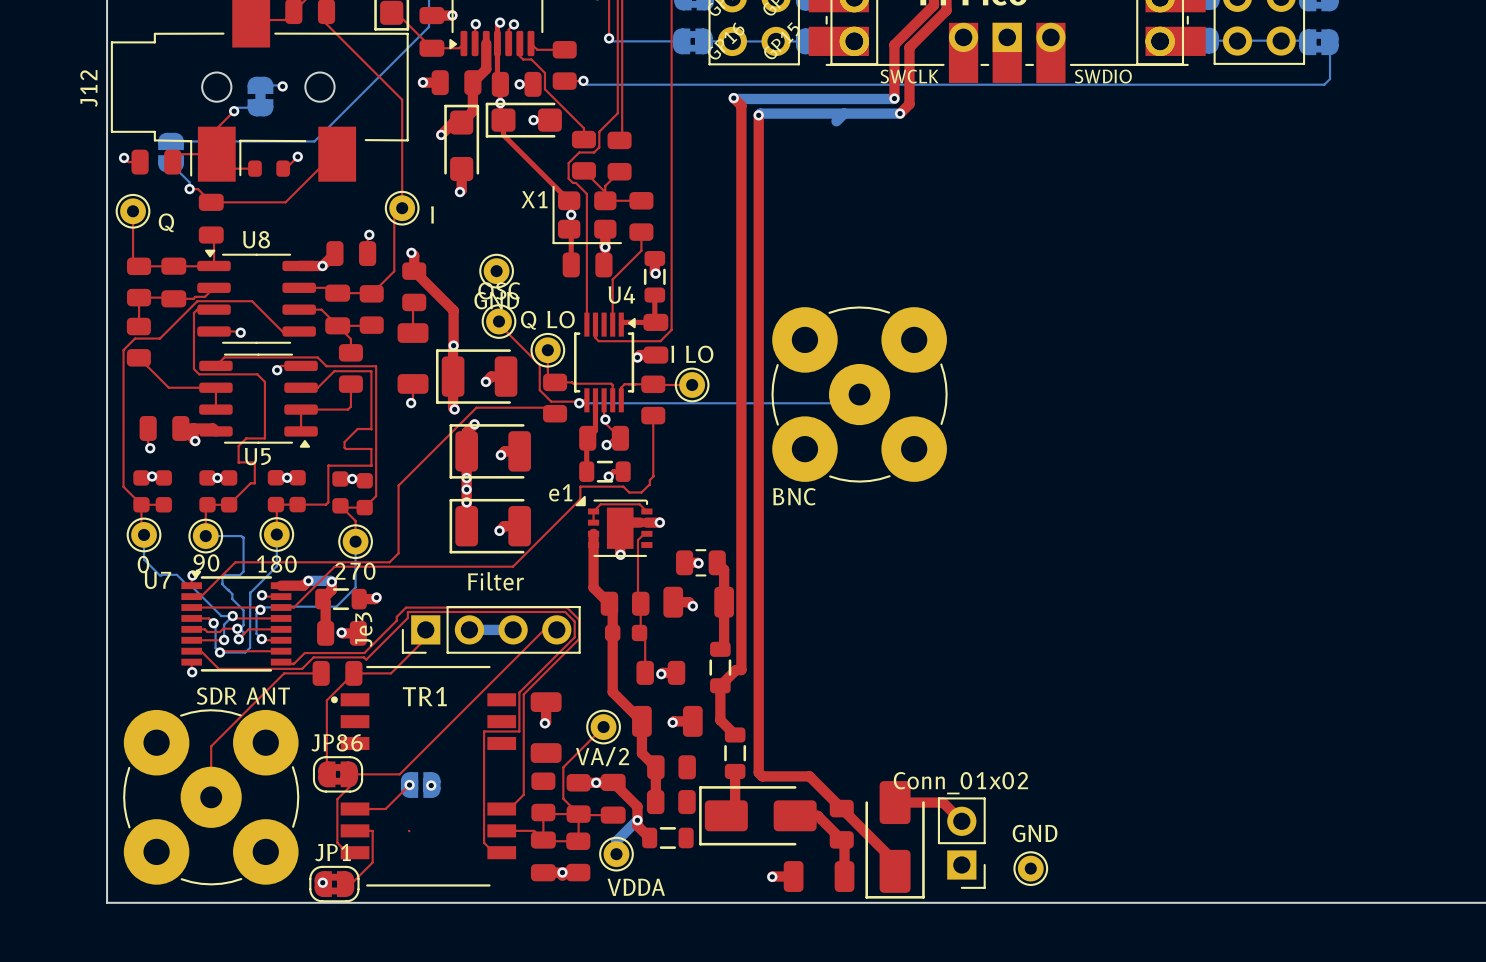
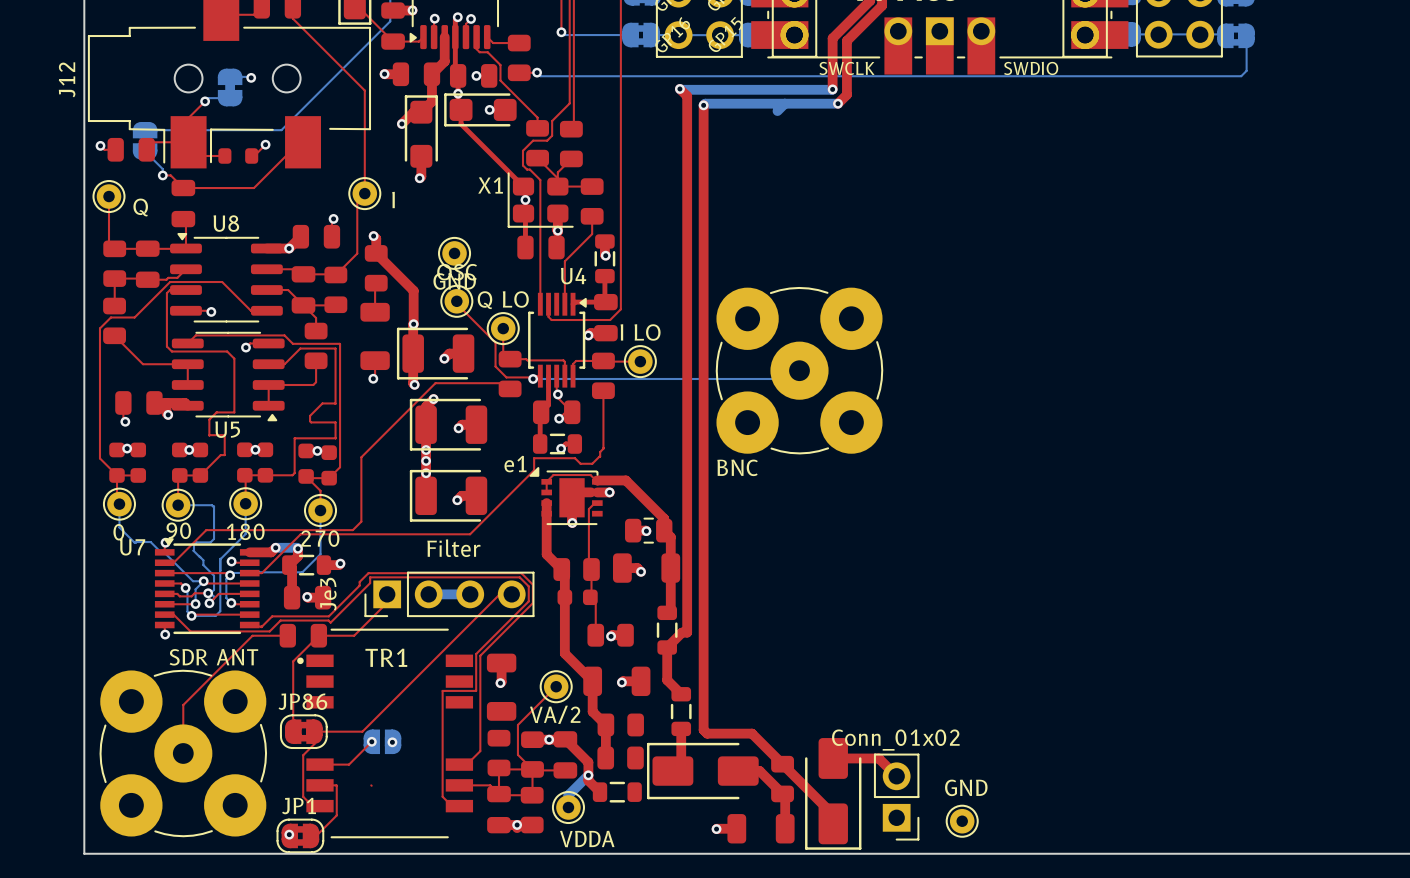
top track: none -> (597, 480) (625, 480) (664, 518) (664, 530)

